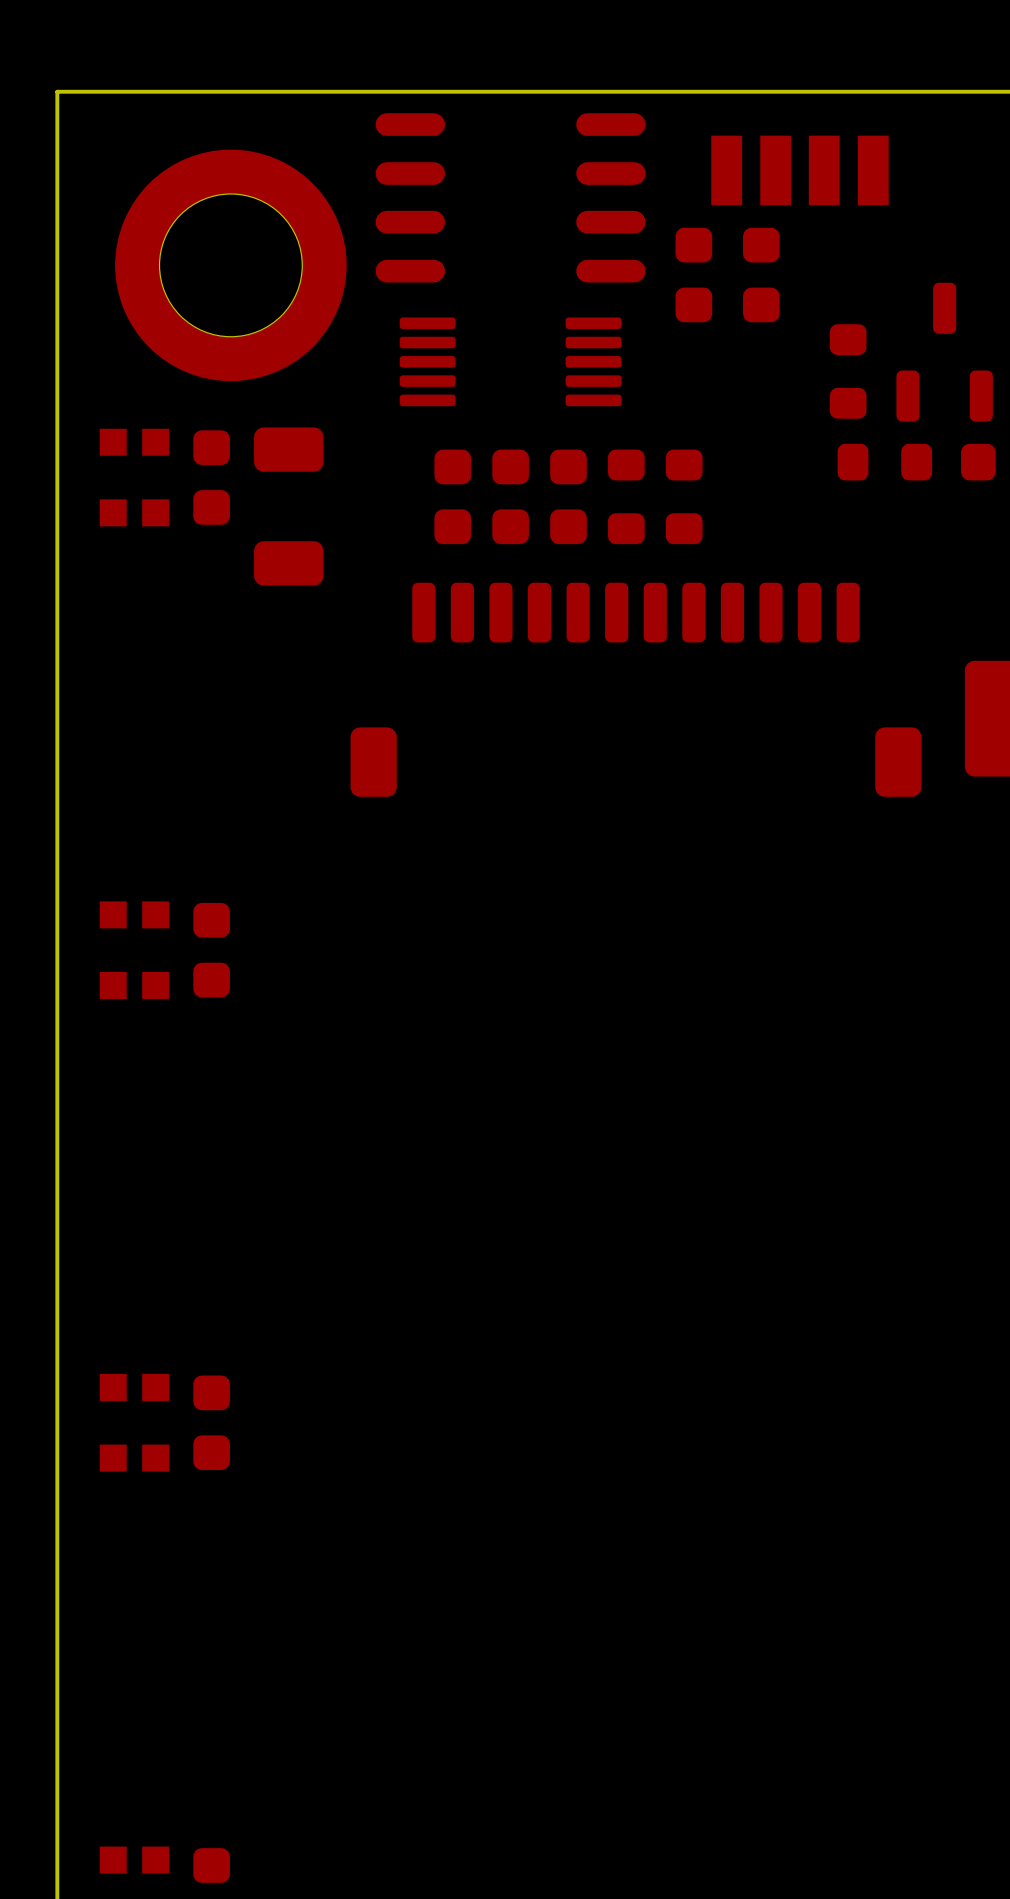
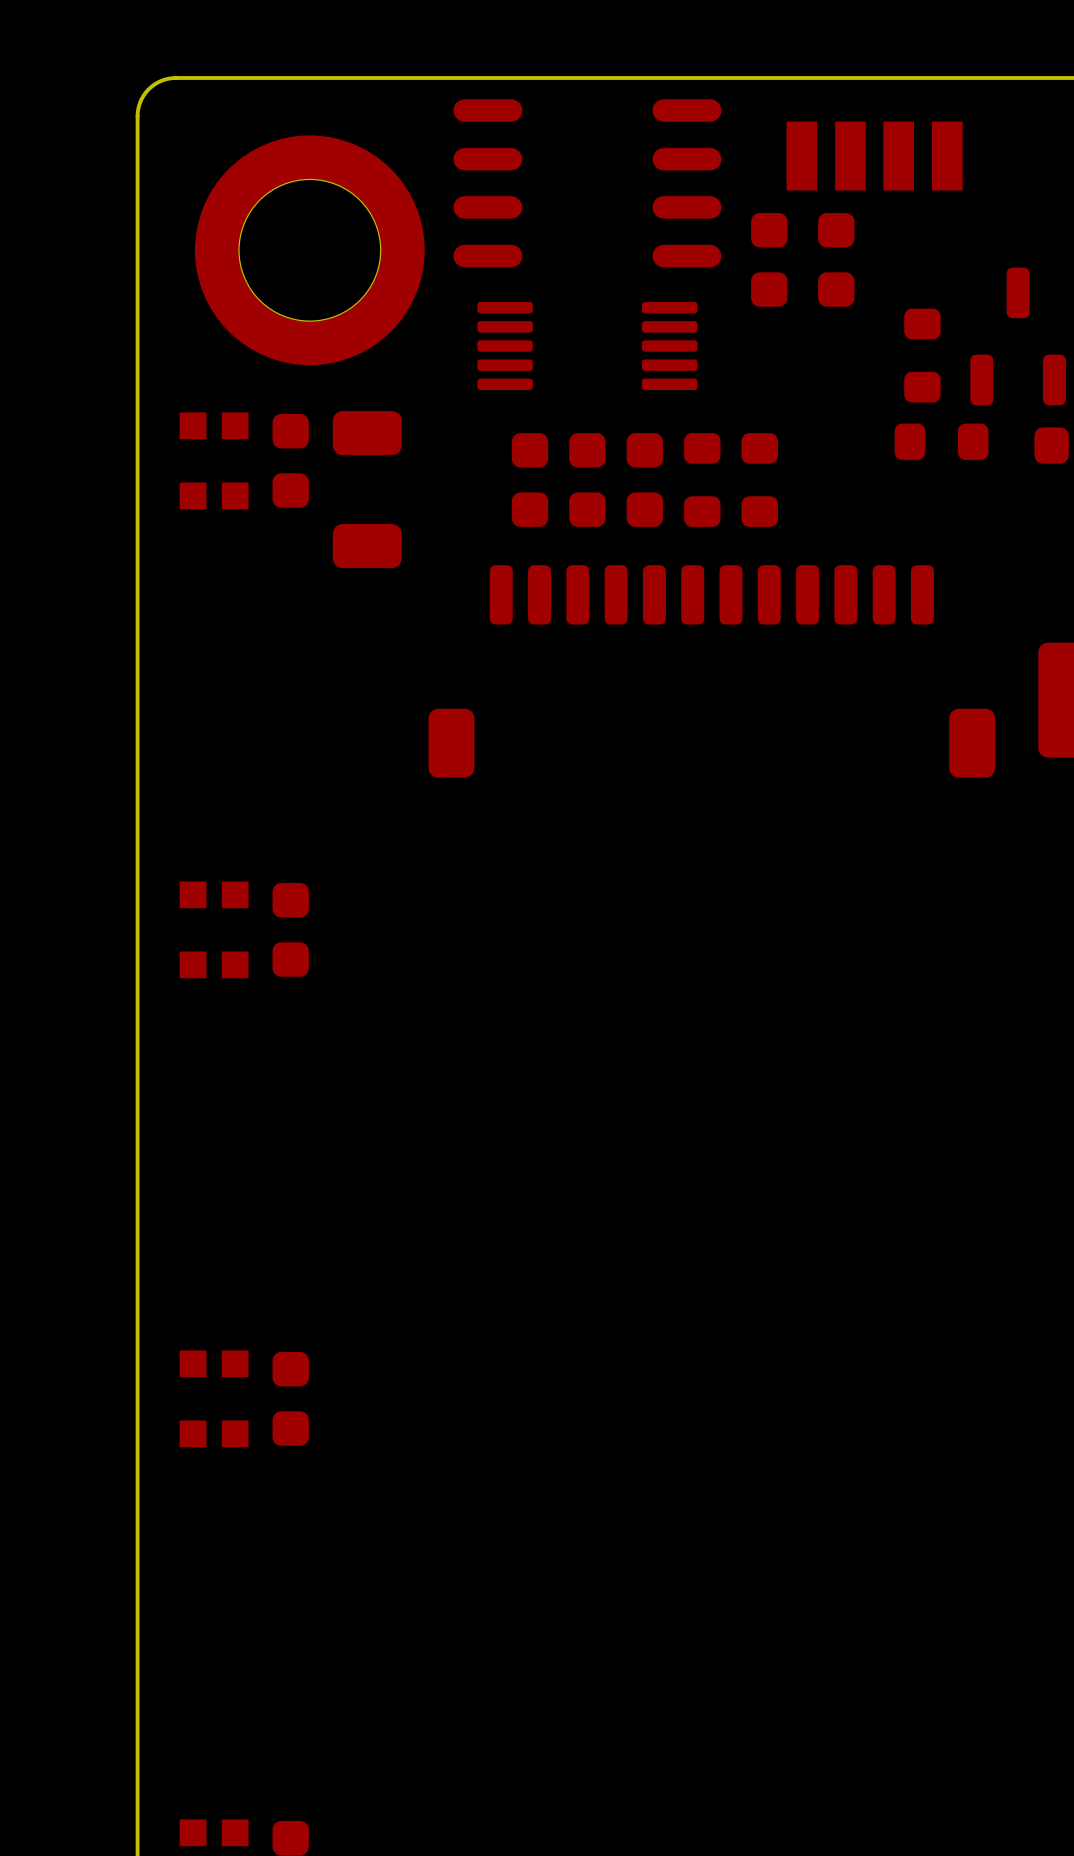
board edge: (95, 91) (57, 91) (57, 130) -> (175, 77) (163, 80) (148, 89) (141, 99) (137, 116)
part position: (884, 462) -> (941, 441)

